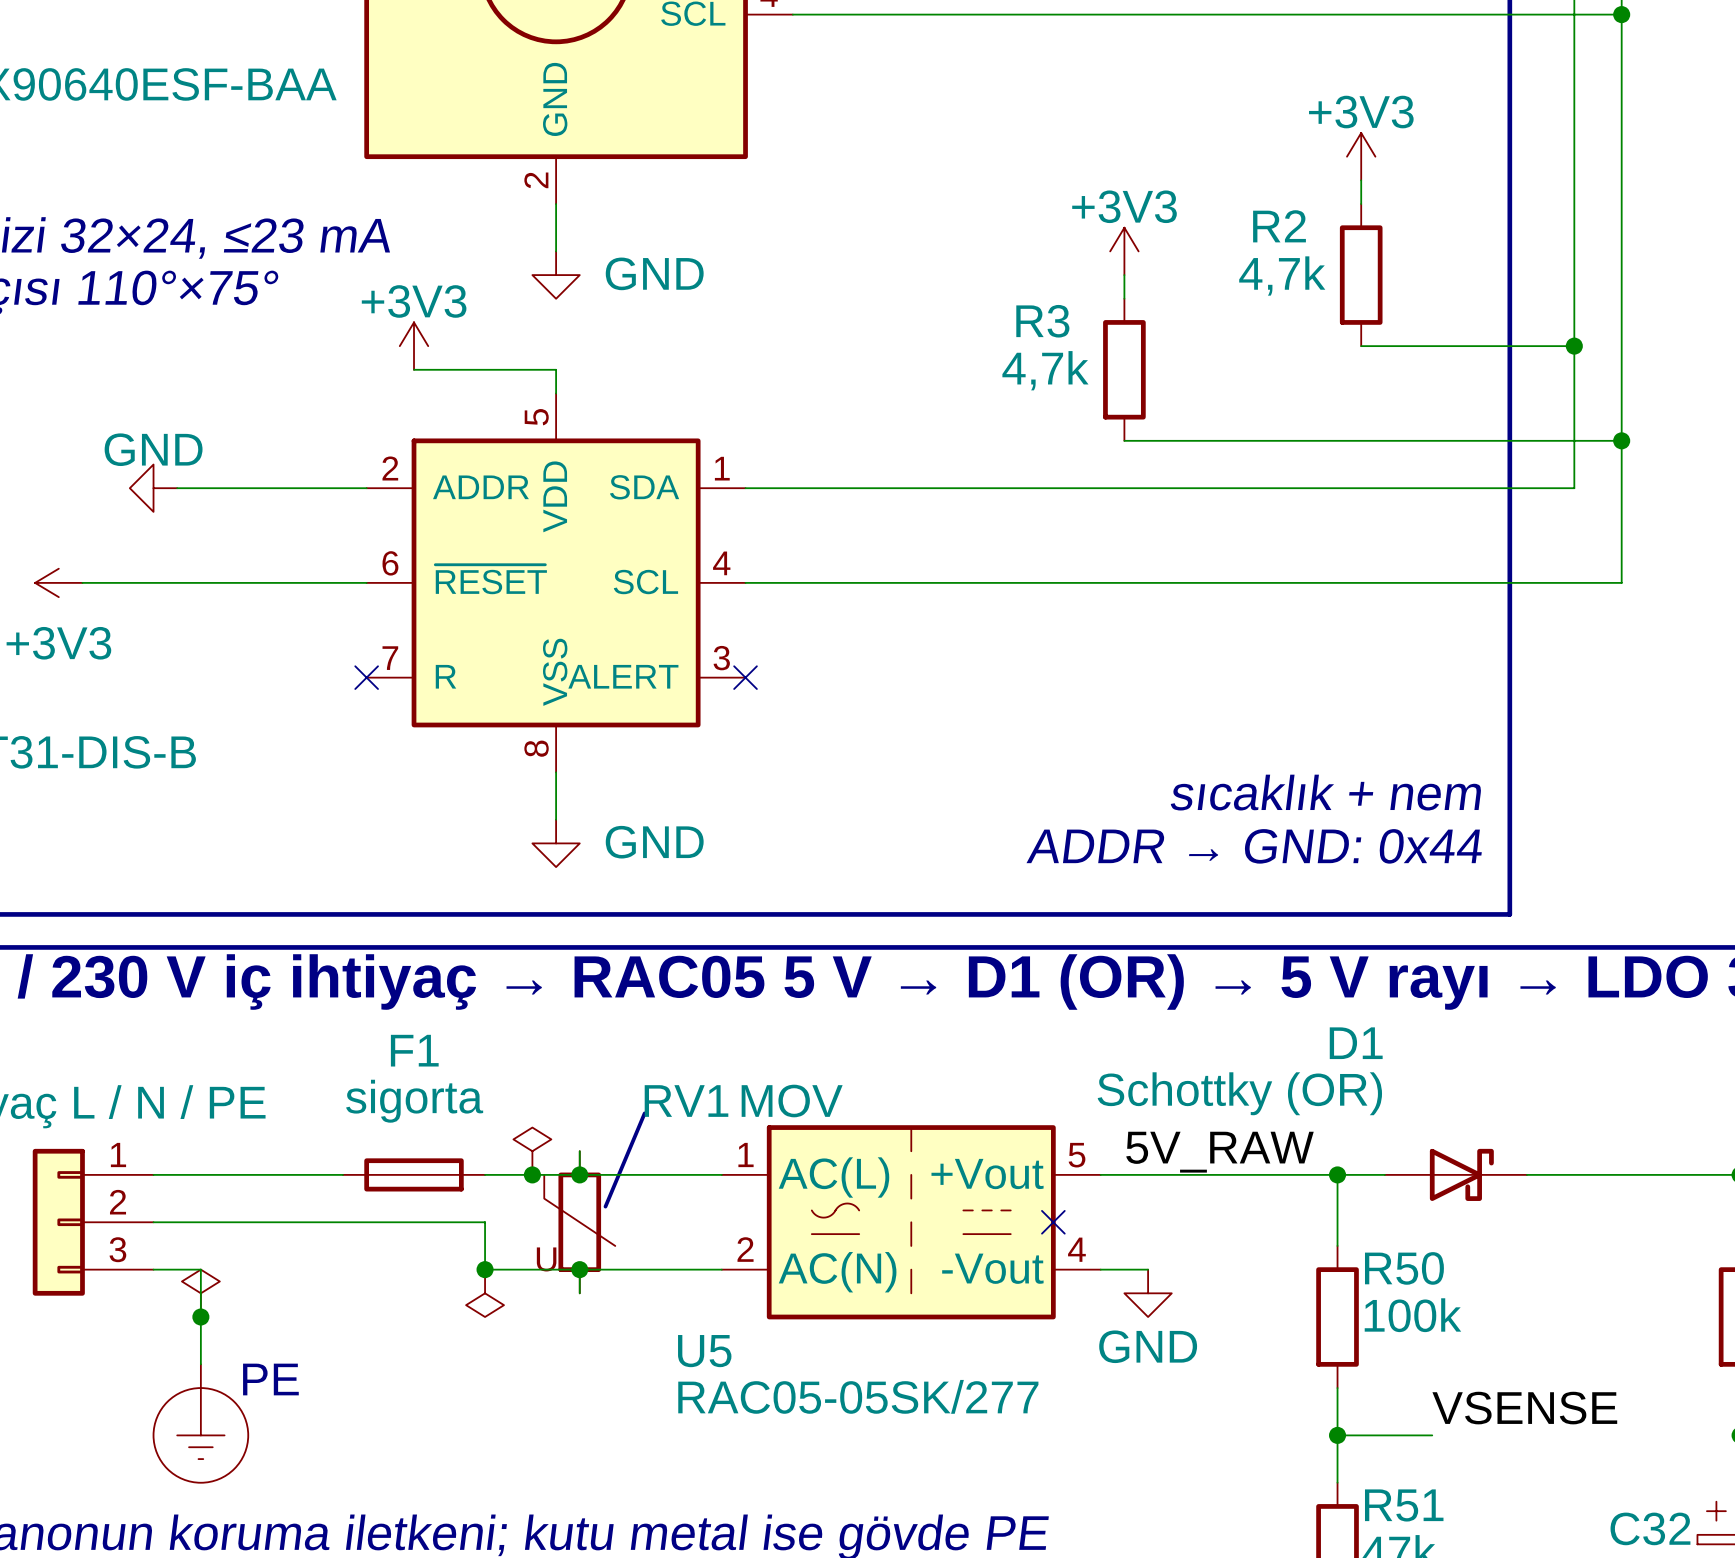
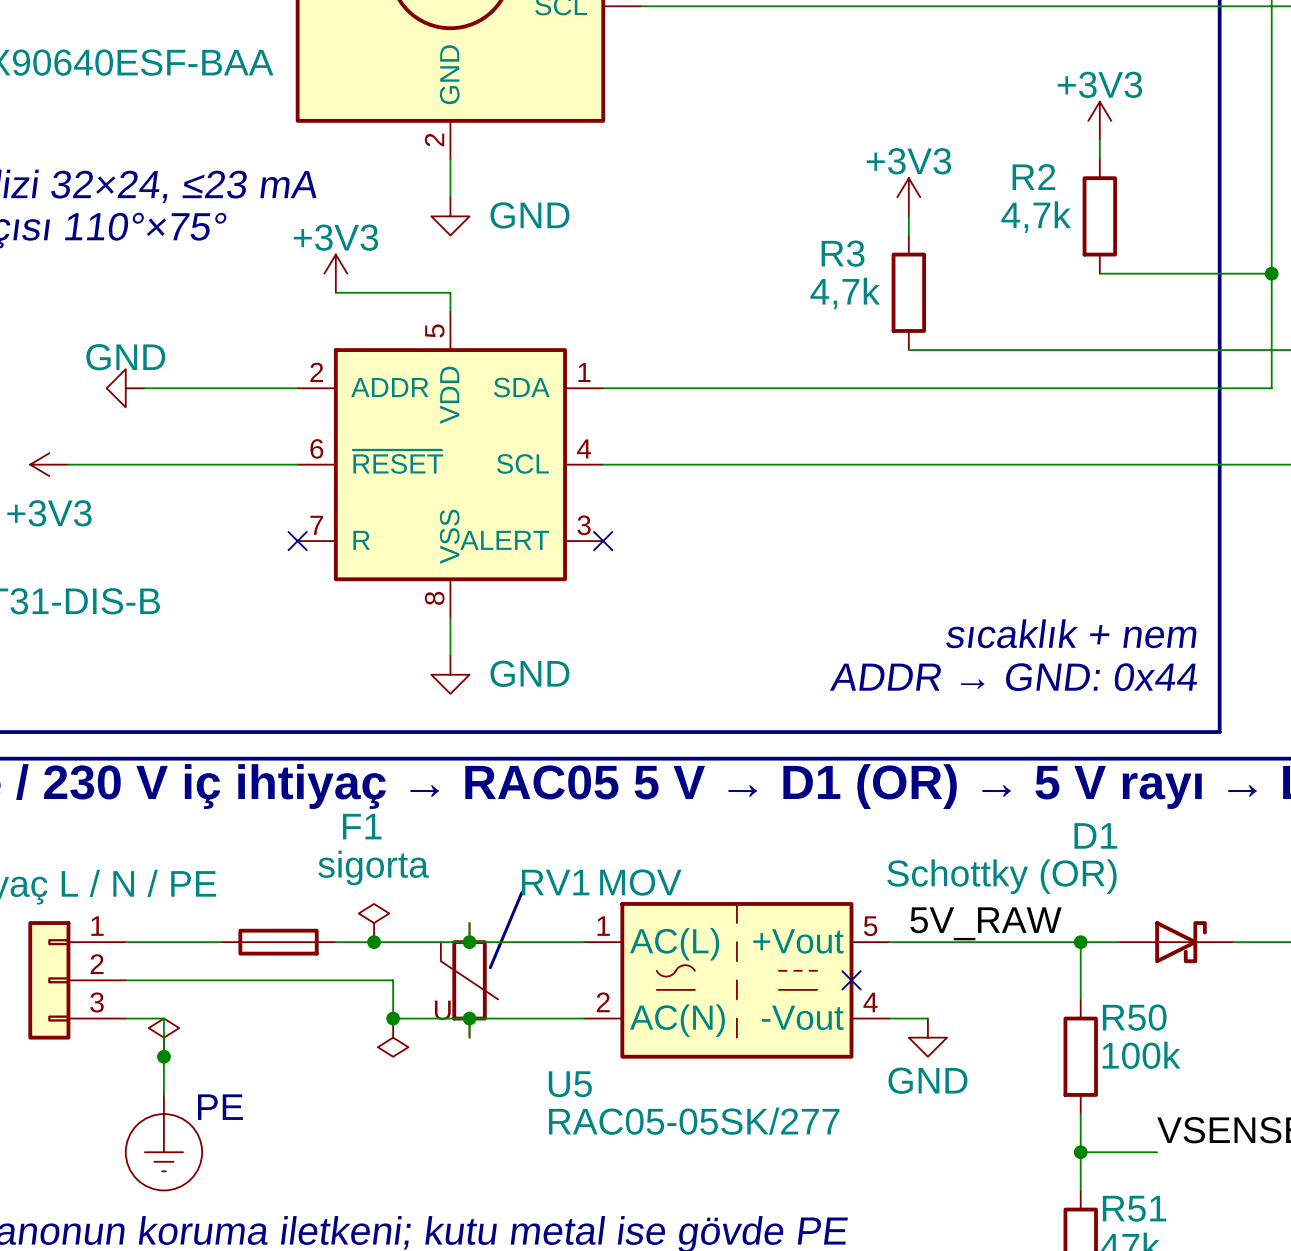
F1 name position: F1 (414, 1050) -> F1 (362, 826)
F1 value position: sigorta (414, 1101) -> sigorta (373, 867)
power symbol position: (532, 1151) -> (374, 923)
F1 position: (414, 1174) -> (278, 942)
junction position: (532, 1174) -> (374, 942)

